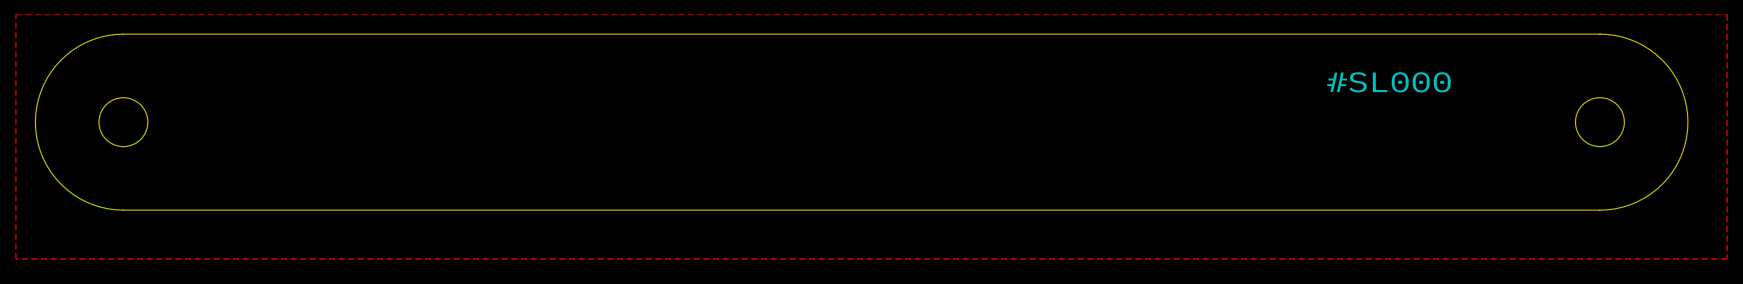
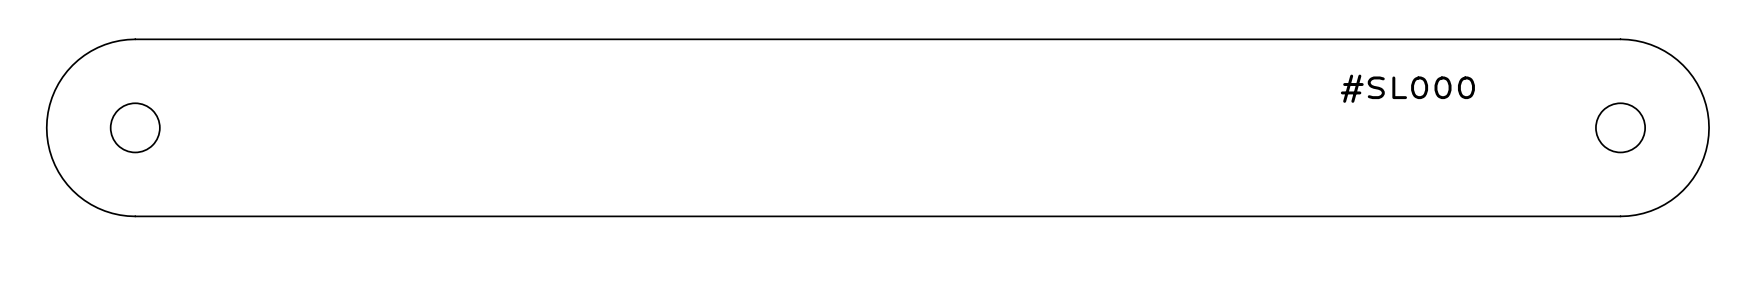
zone outline: (15, 14) (15, 259) (1727, 259) (1727, 14) (15, 14) -> none

